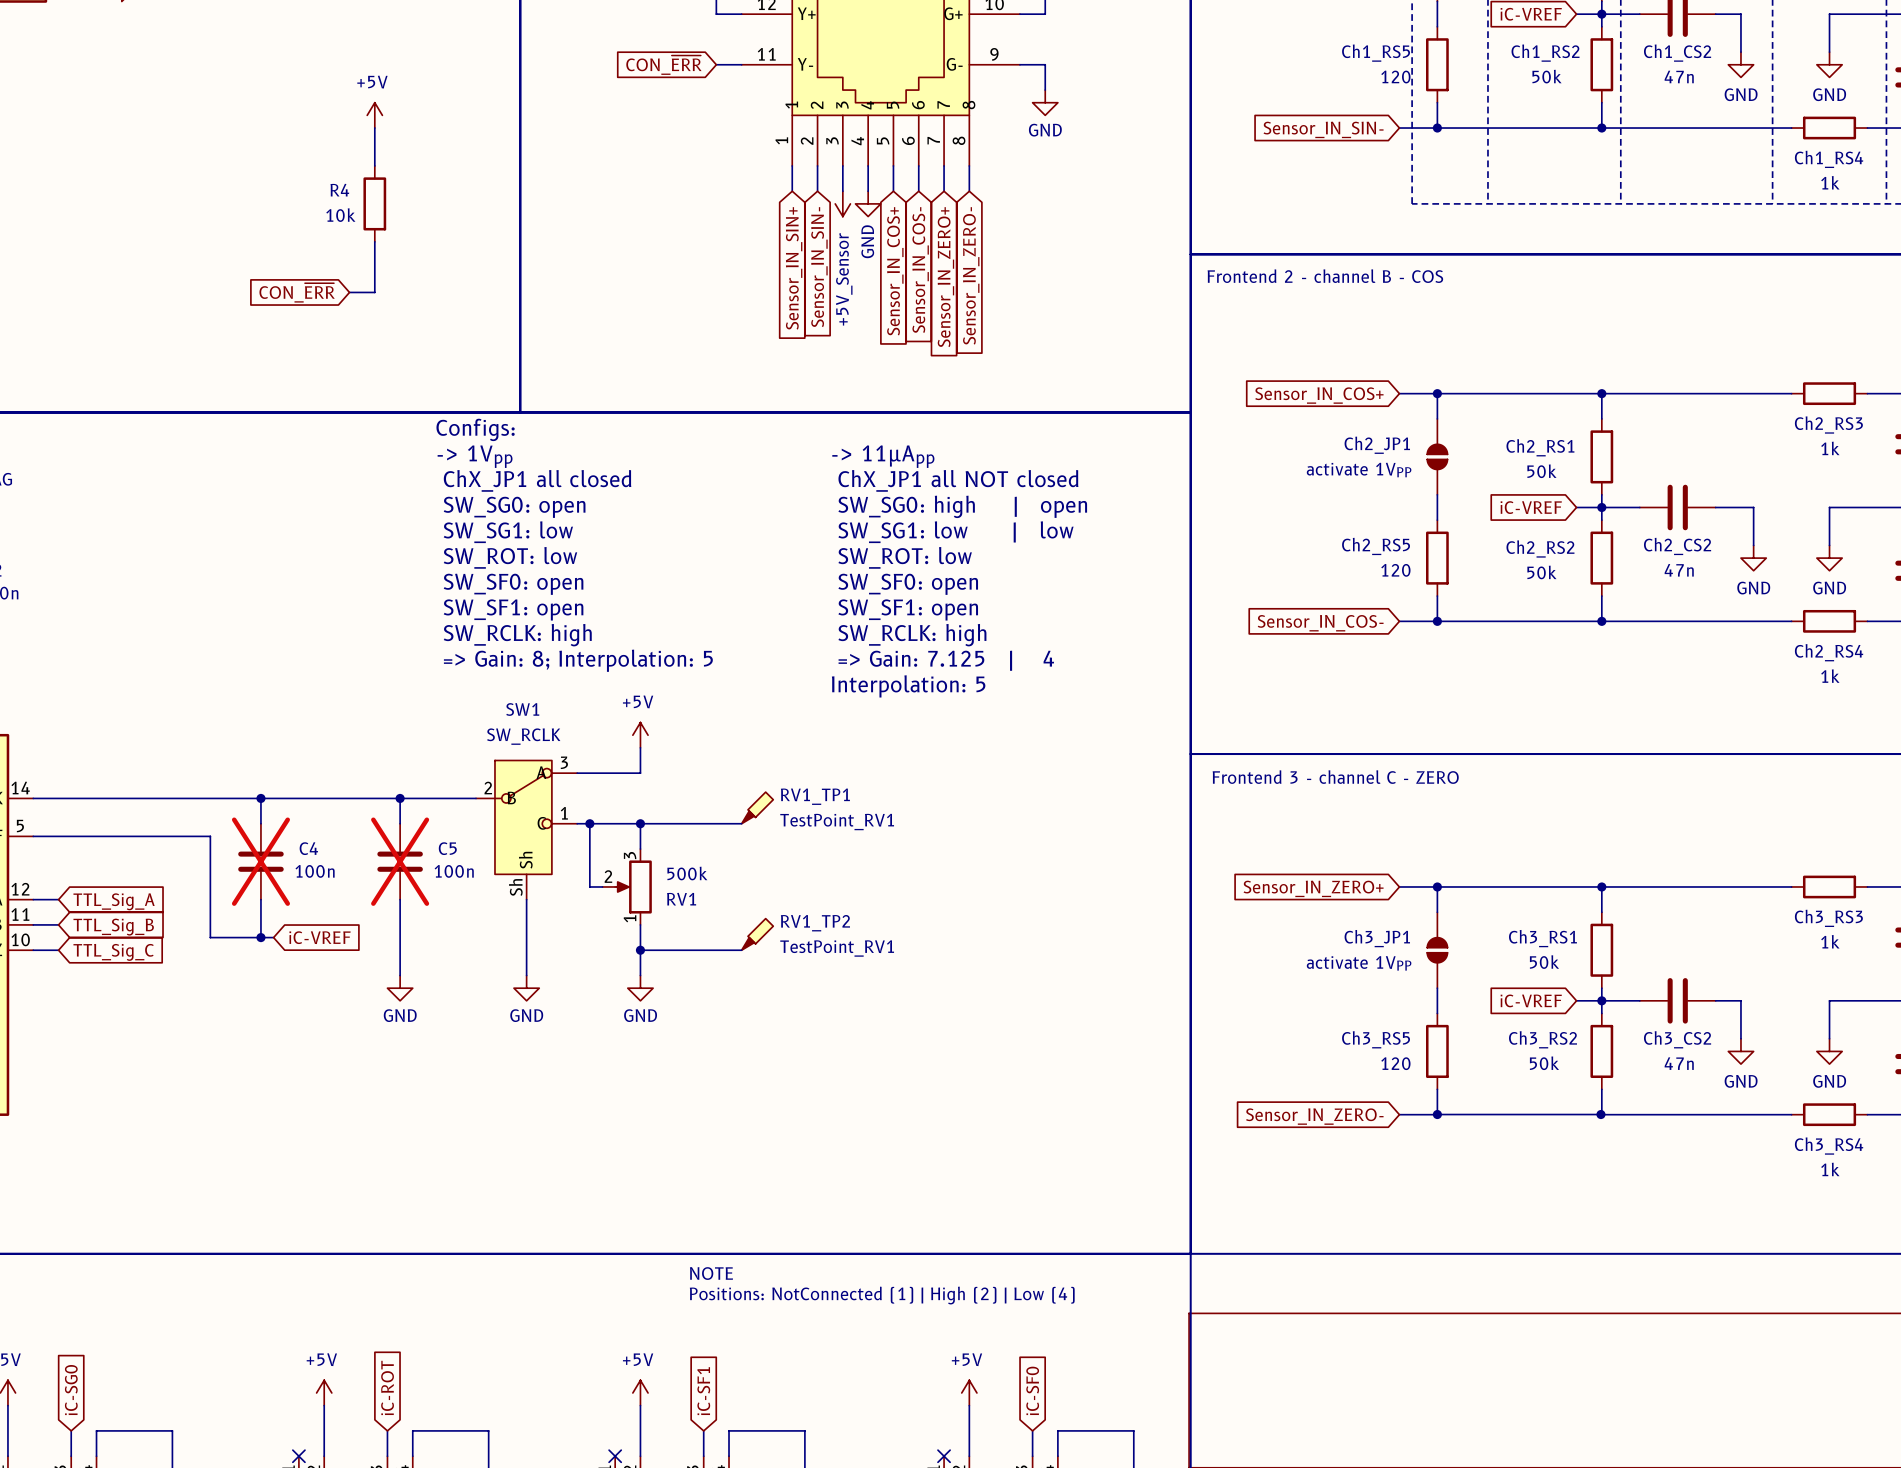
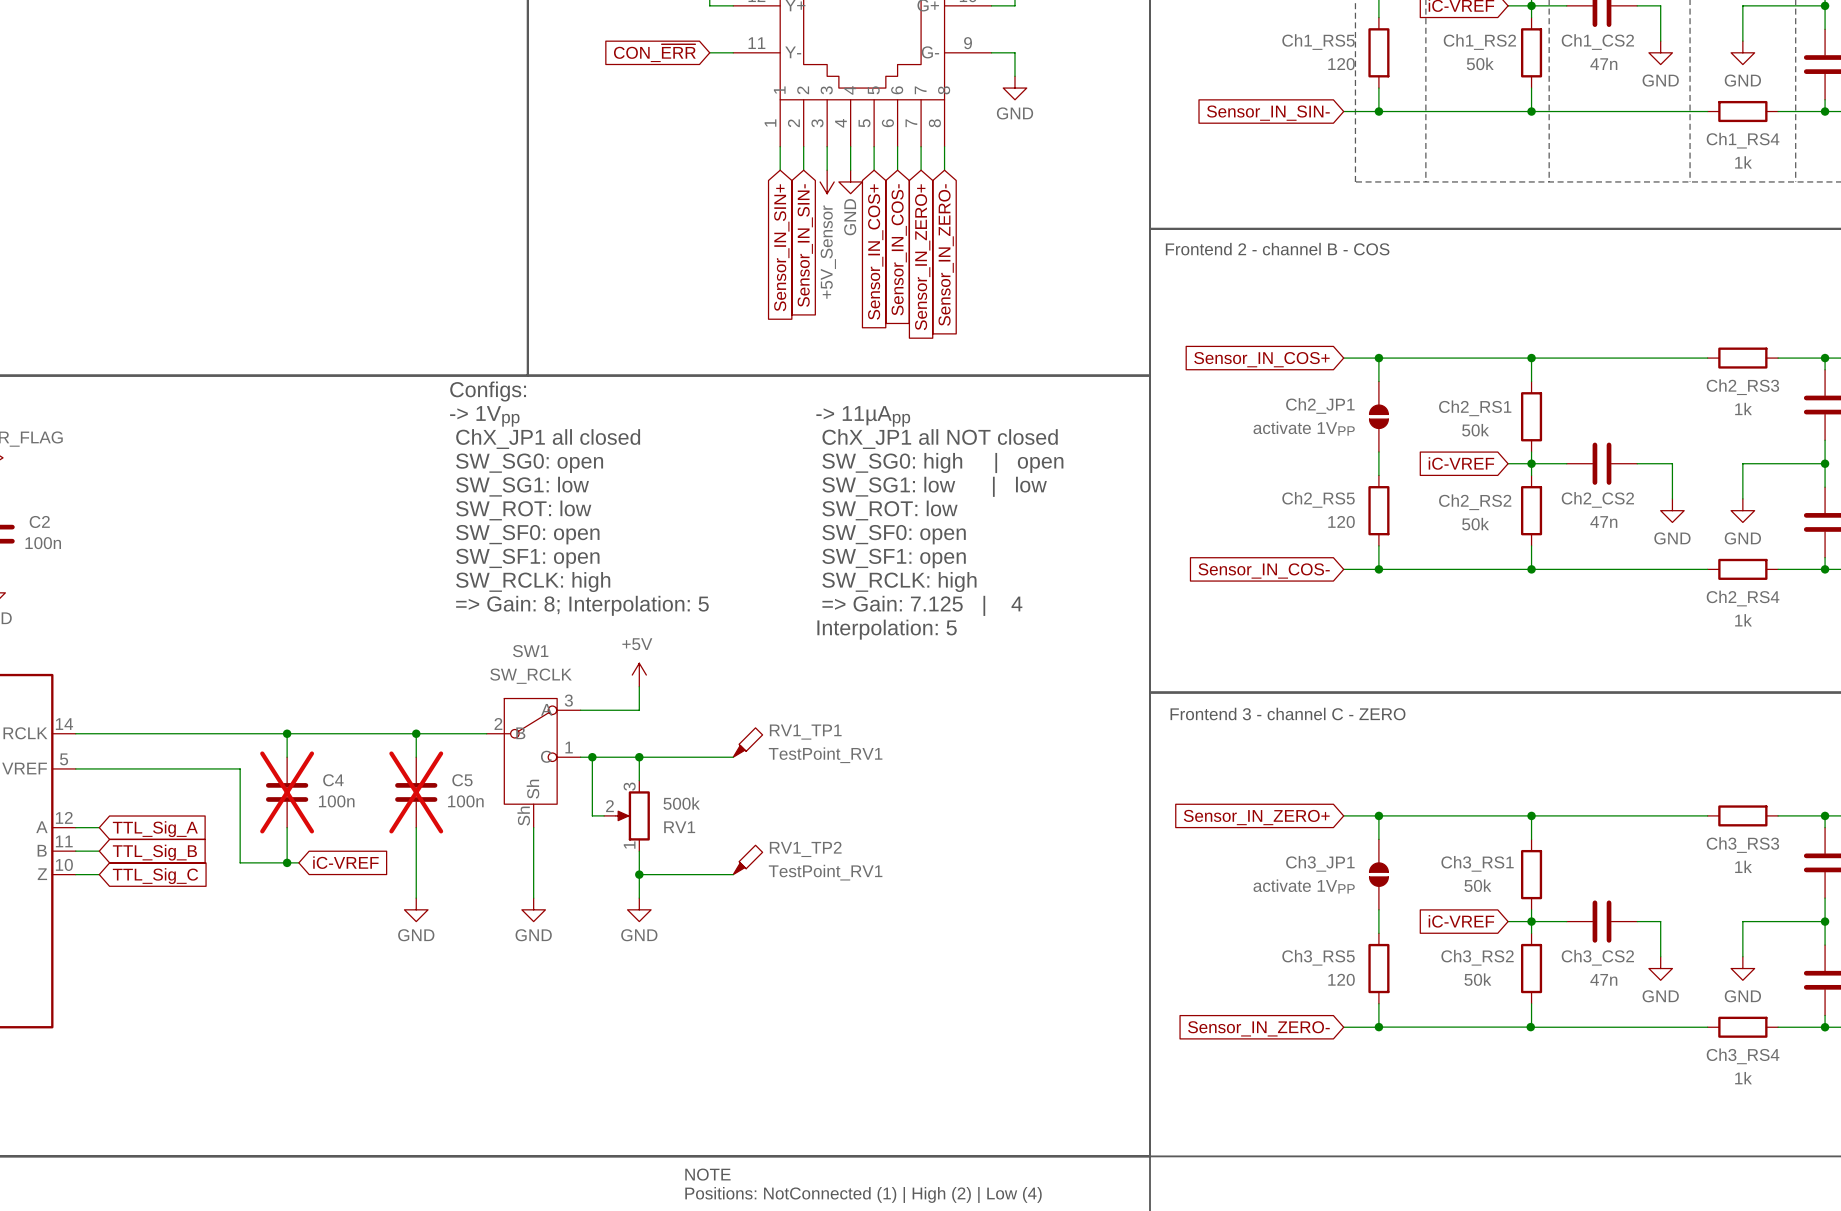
power symbol: +5V (374, 115) -> none
wire: (374, 128) (374, 165) -> none
R4: 10k (374, 203) -> none
wire: (374, 241) (374, 292) (349, 292) -> none
global label: CON_~{ERR} (297, 292) -> none

